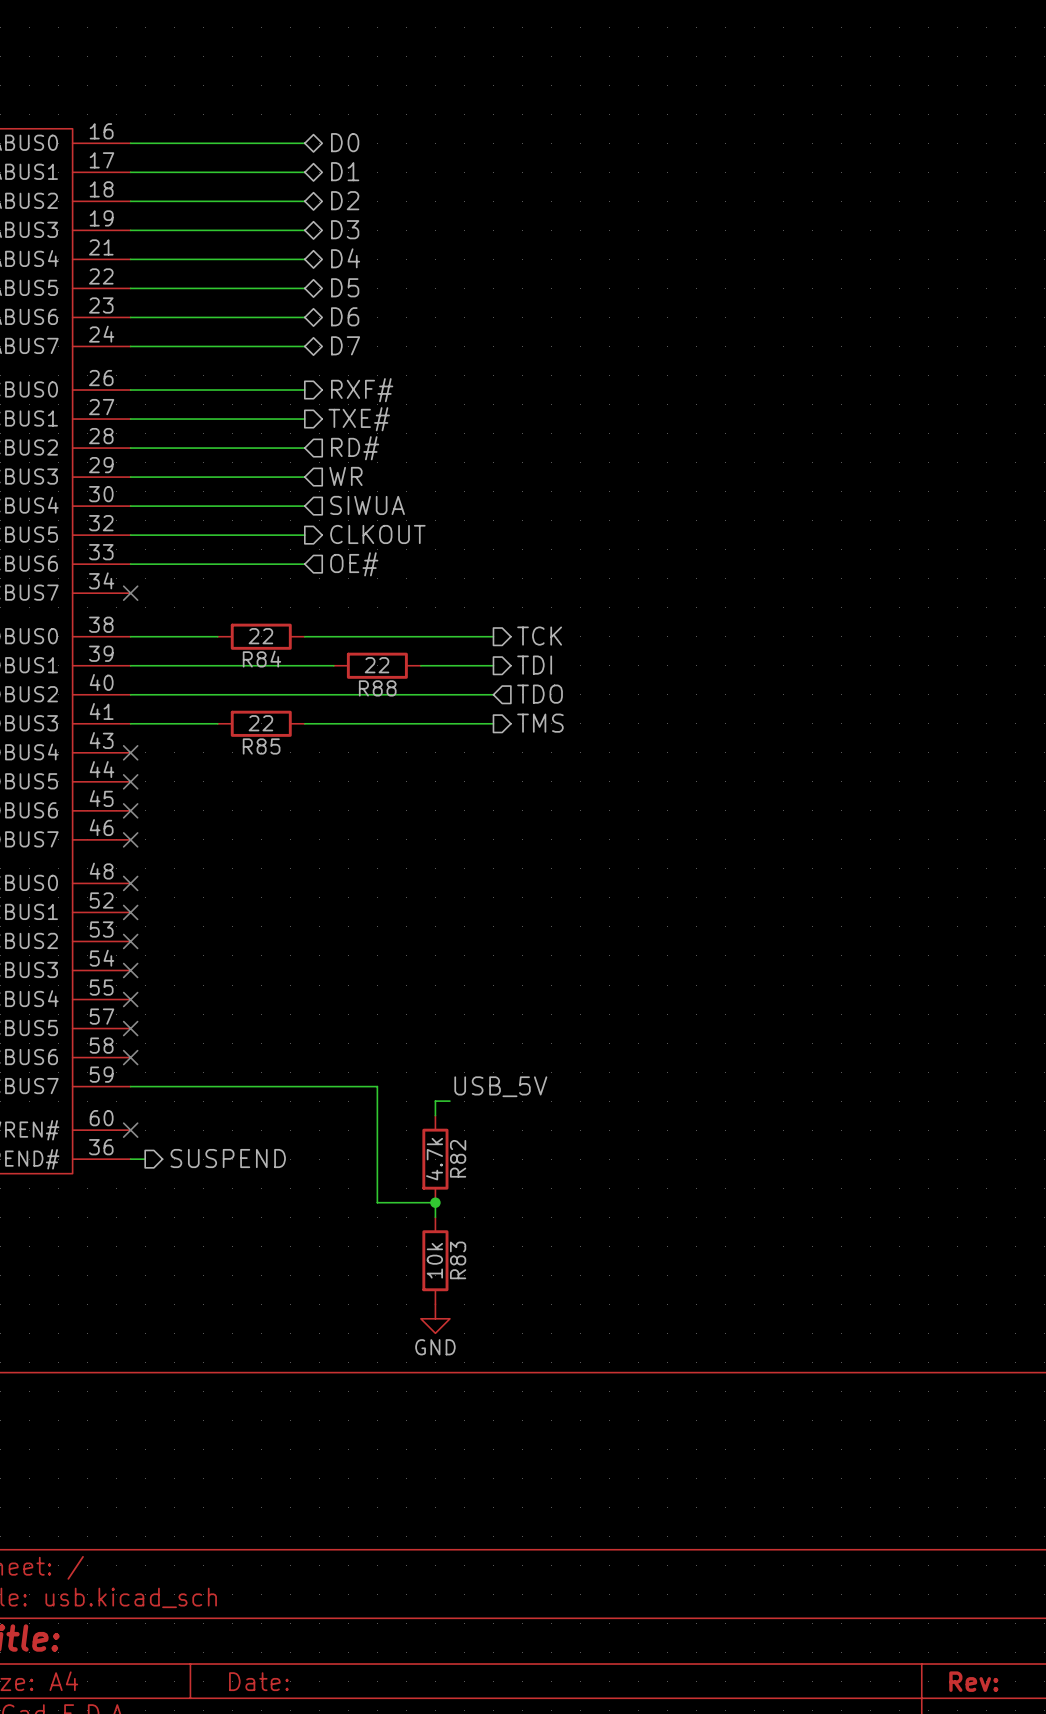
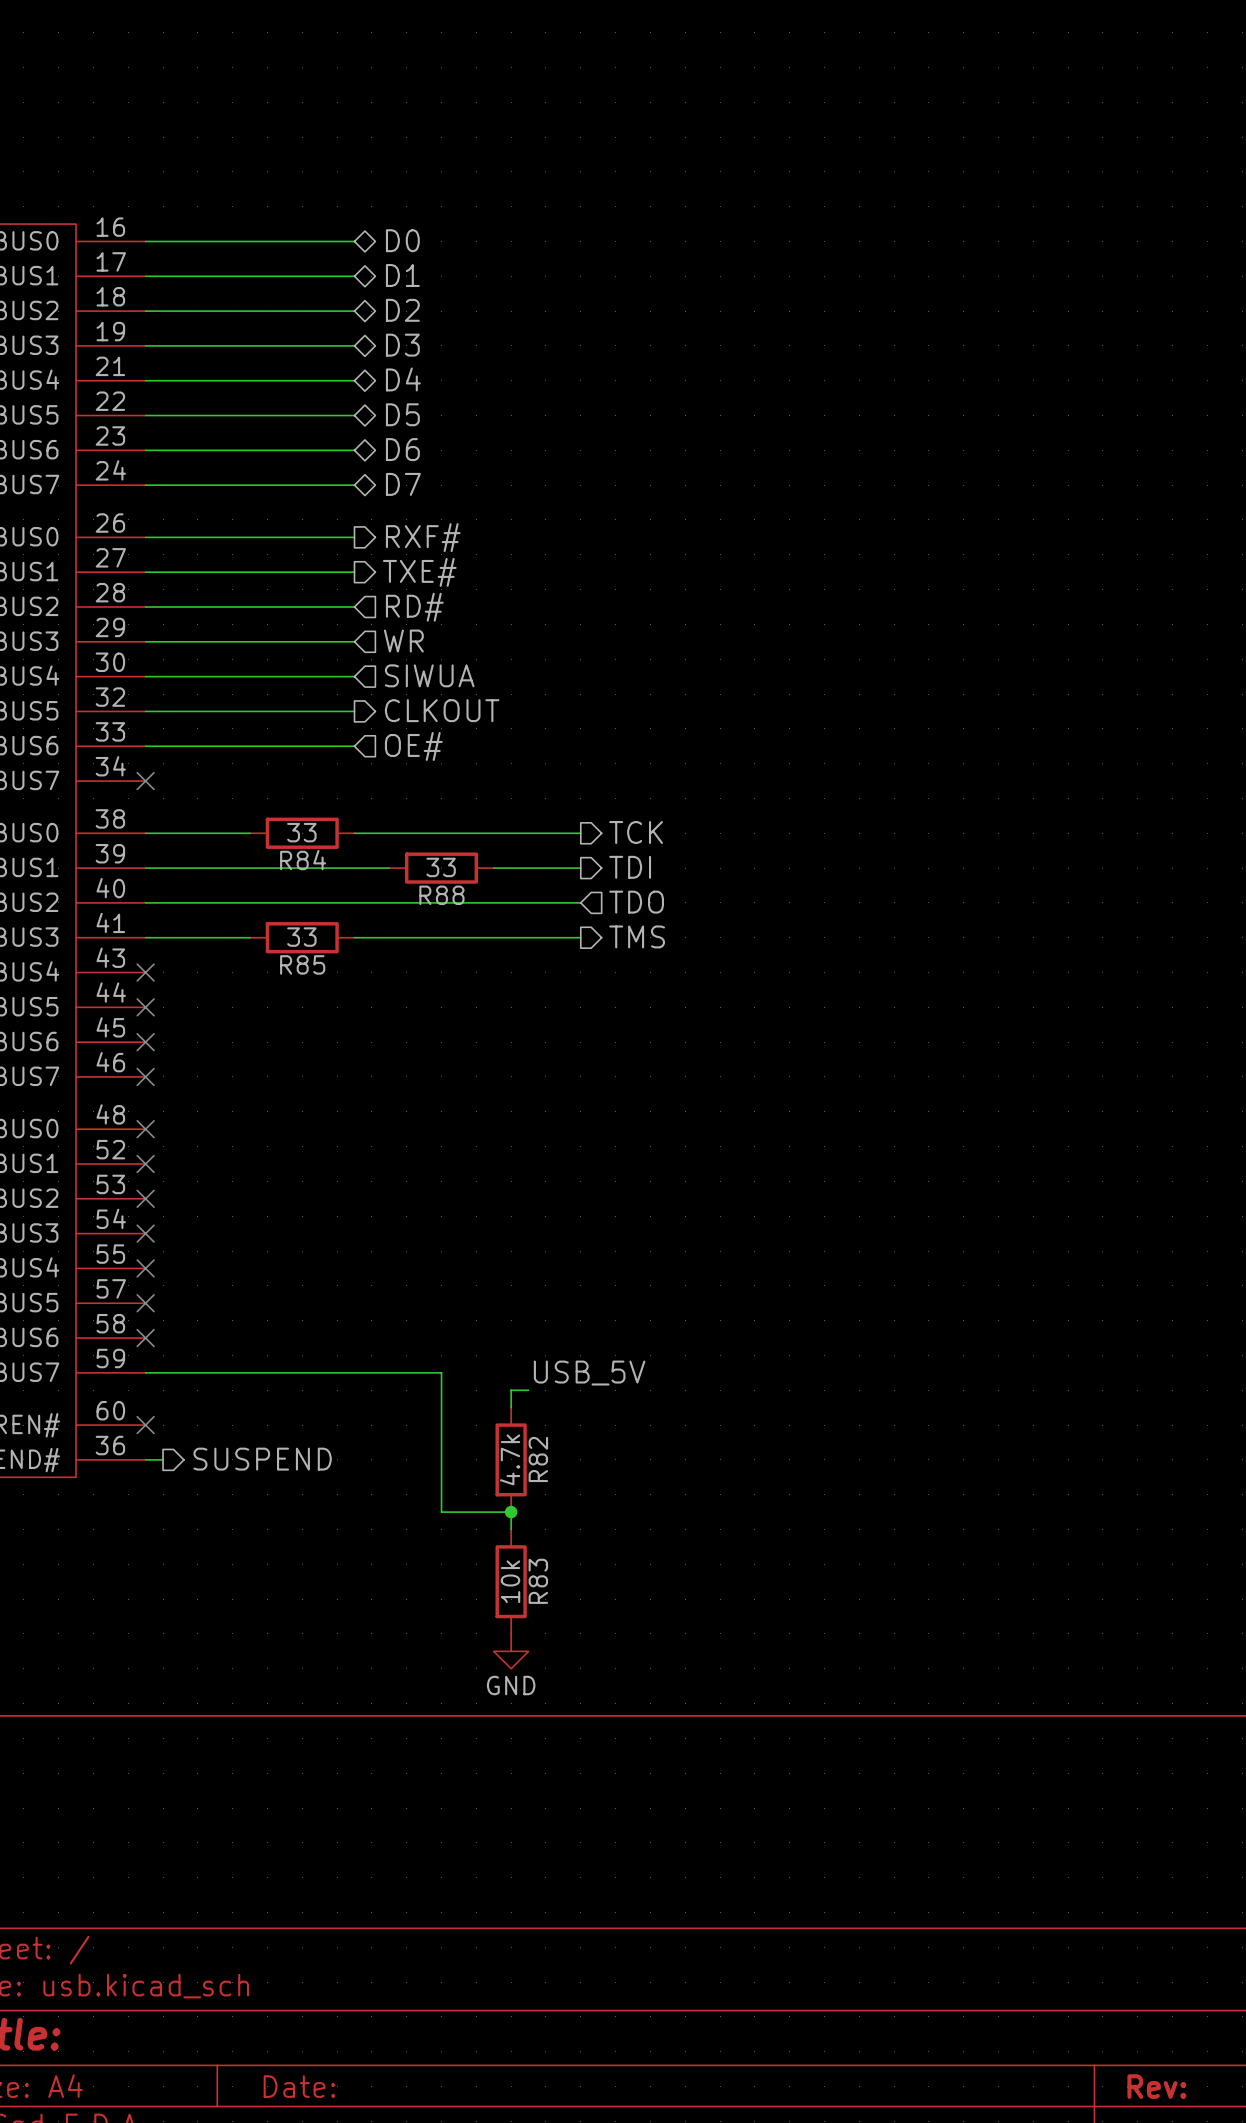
R84 value: 22 (260, 636) -> 33 (301, 832)
R88 value: 22 (377, 665) -> 33 (441, 867)
R85 value: 22 (260, 723) -> 33 (301, 937)

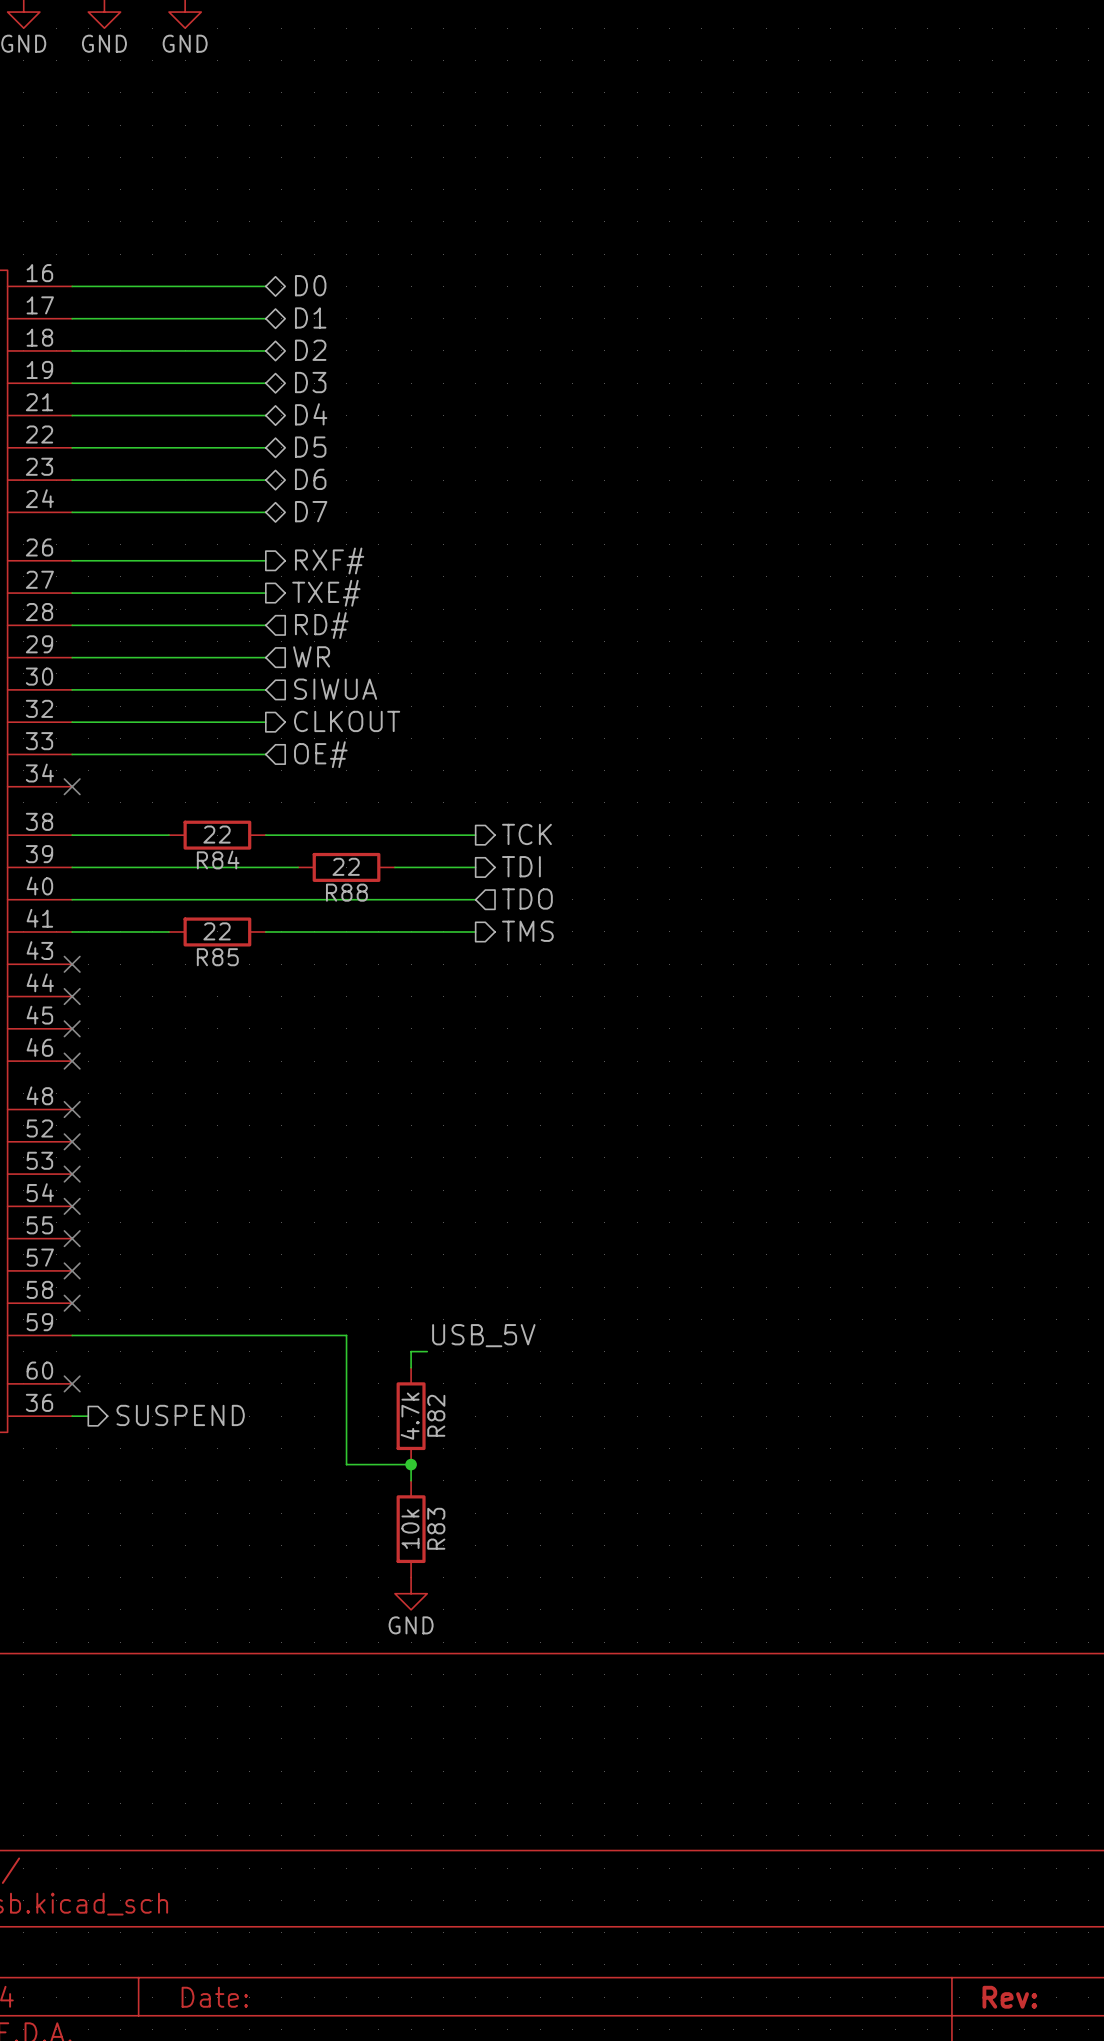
R84 value: 33 (301, 832) -> 22 (217, 834)
R88 value: 33 (441, 867) -> 22 (346, 866)
R85 value: 33 (301, 937) -> 22 (217, 931)

